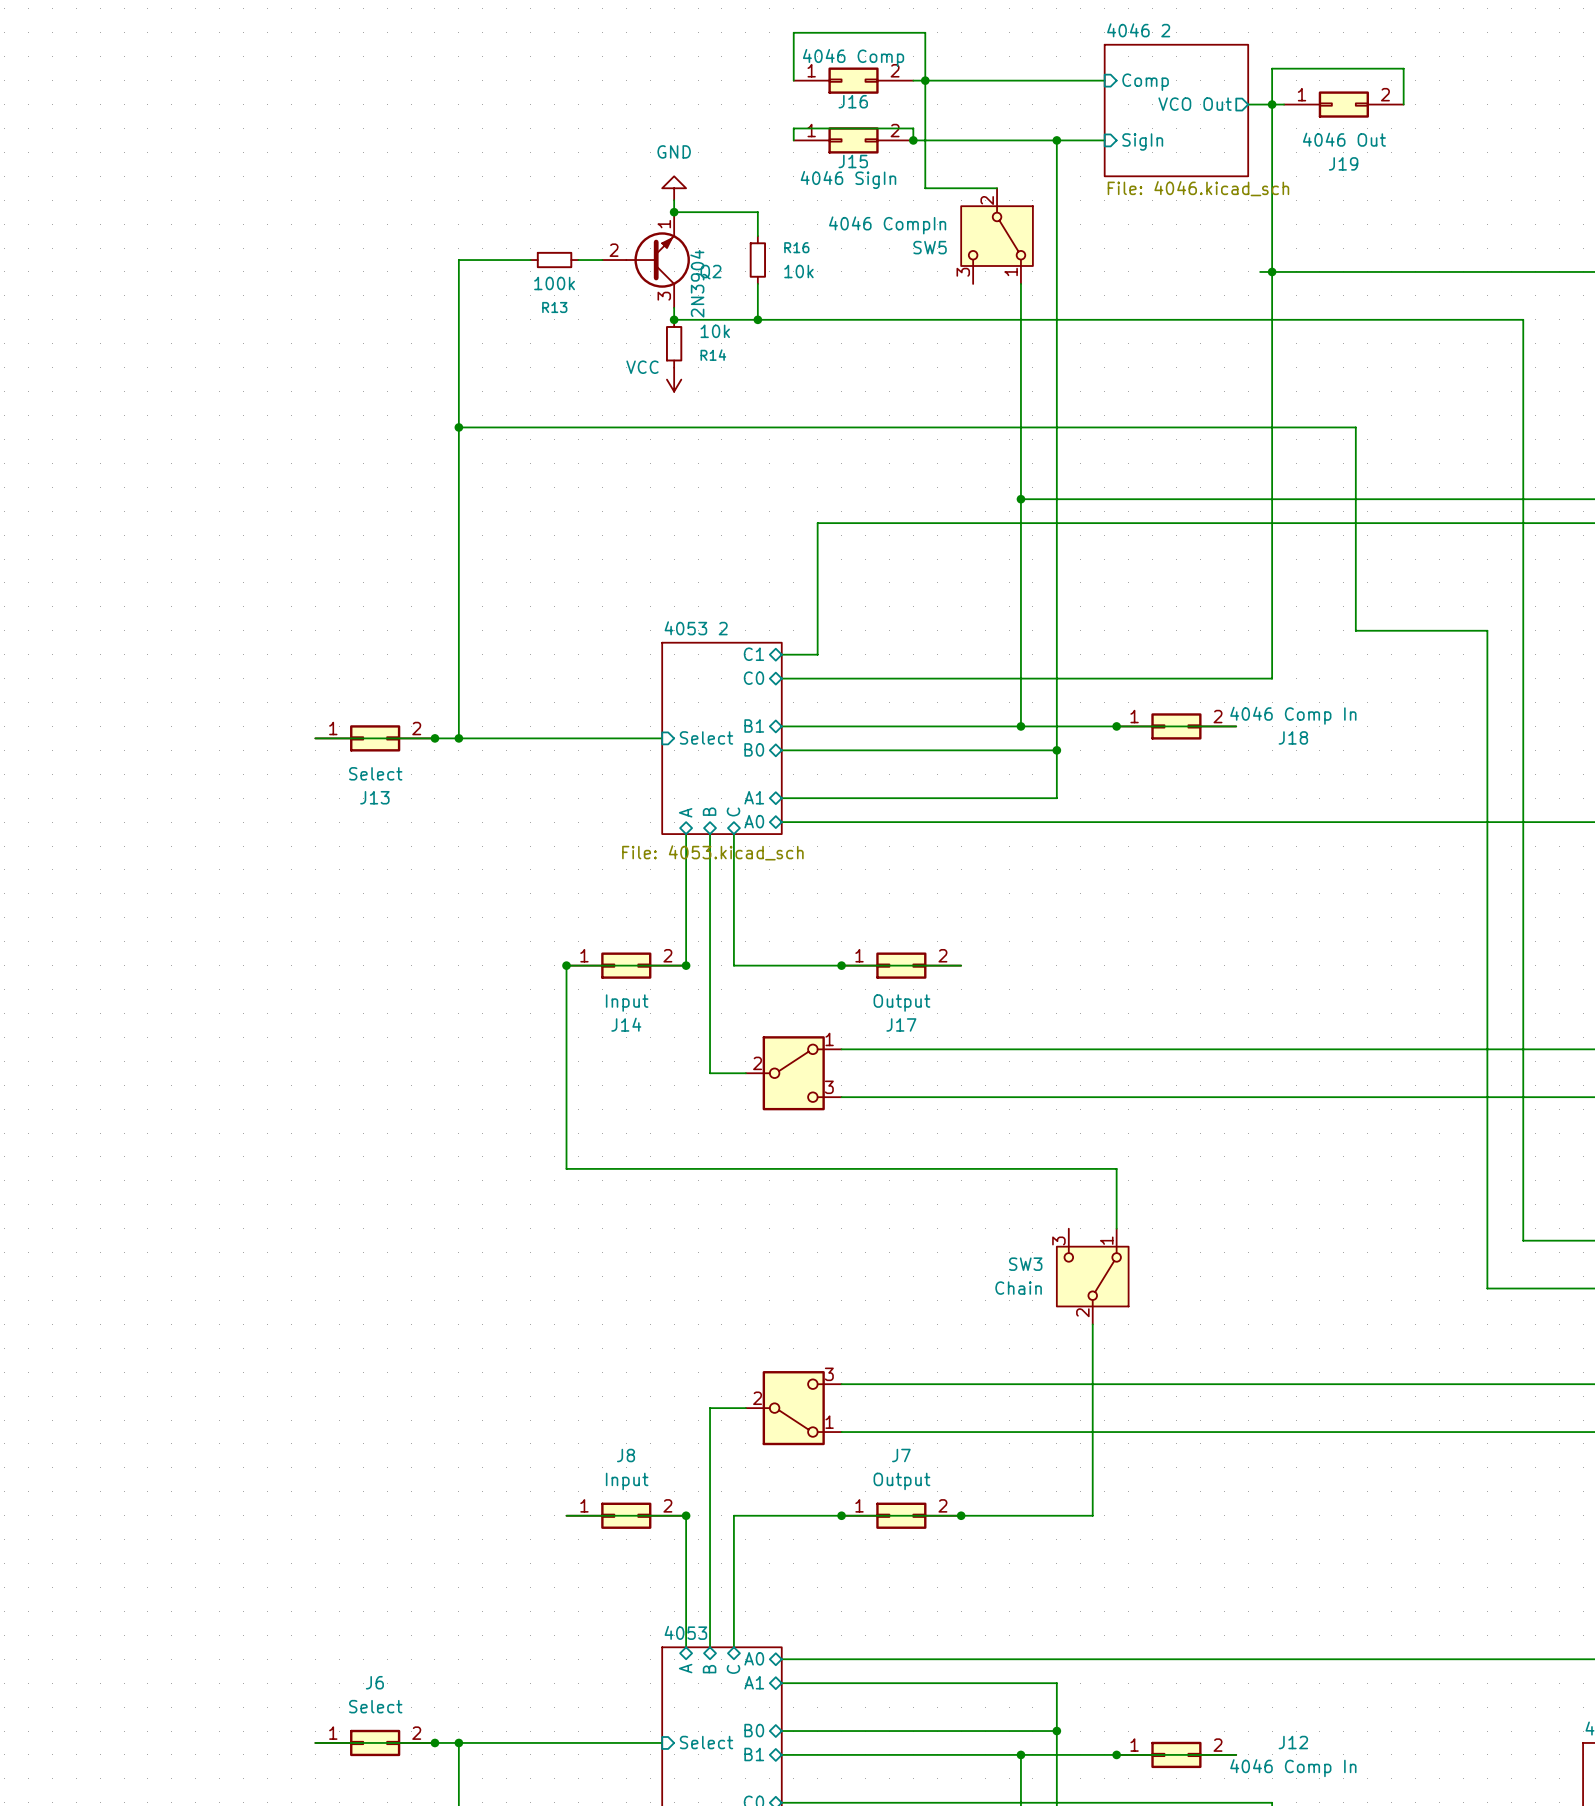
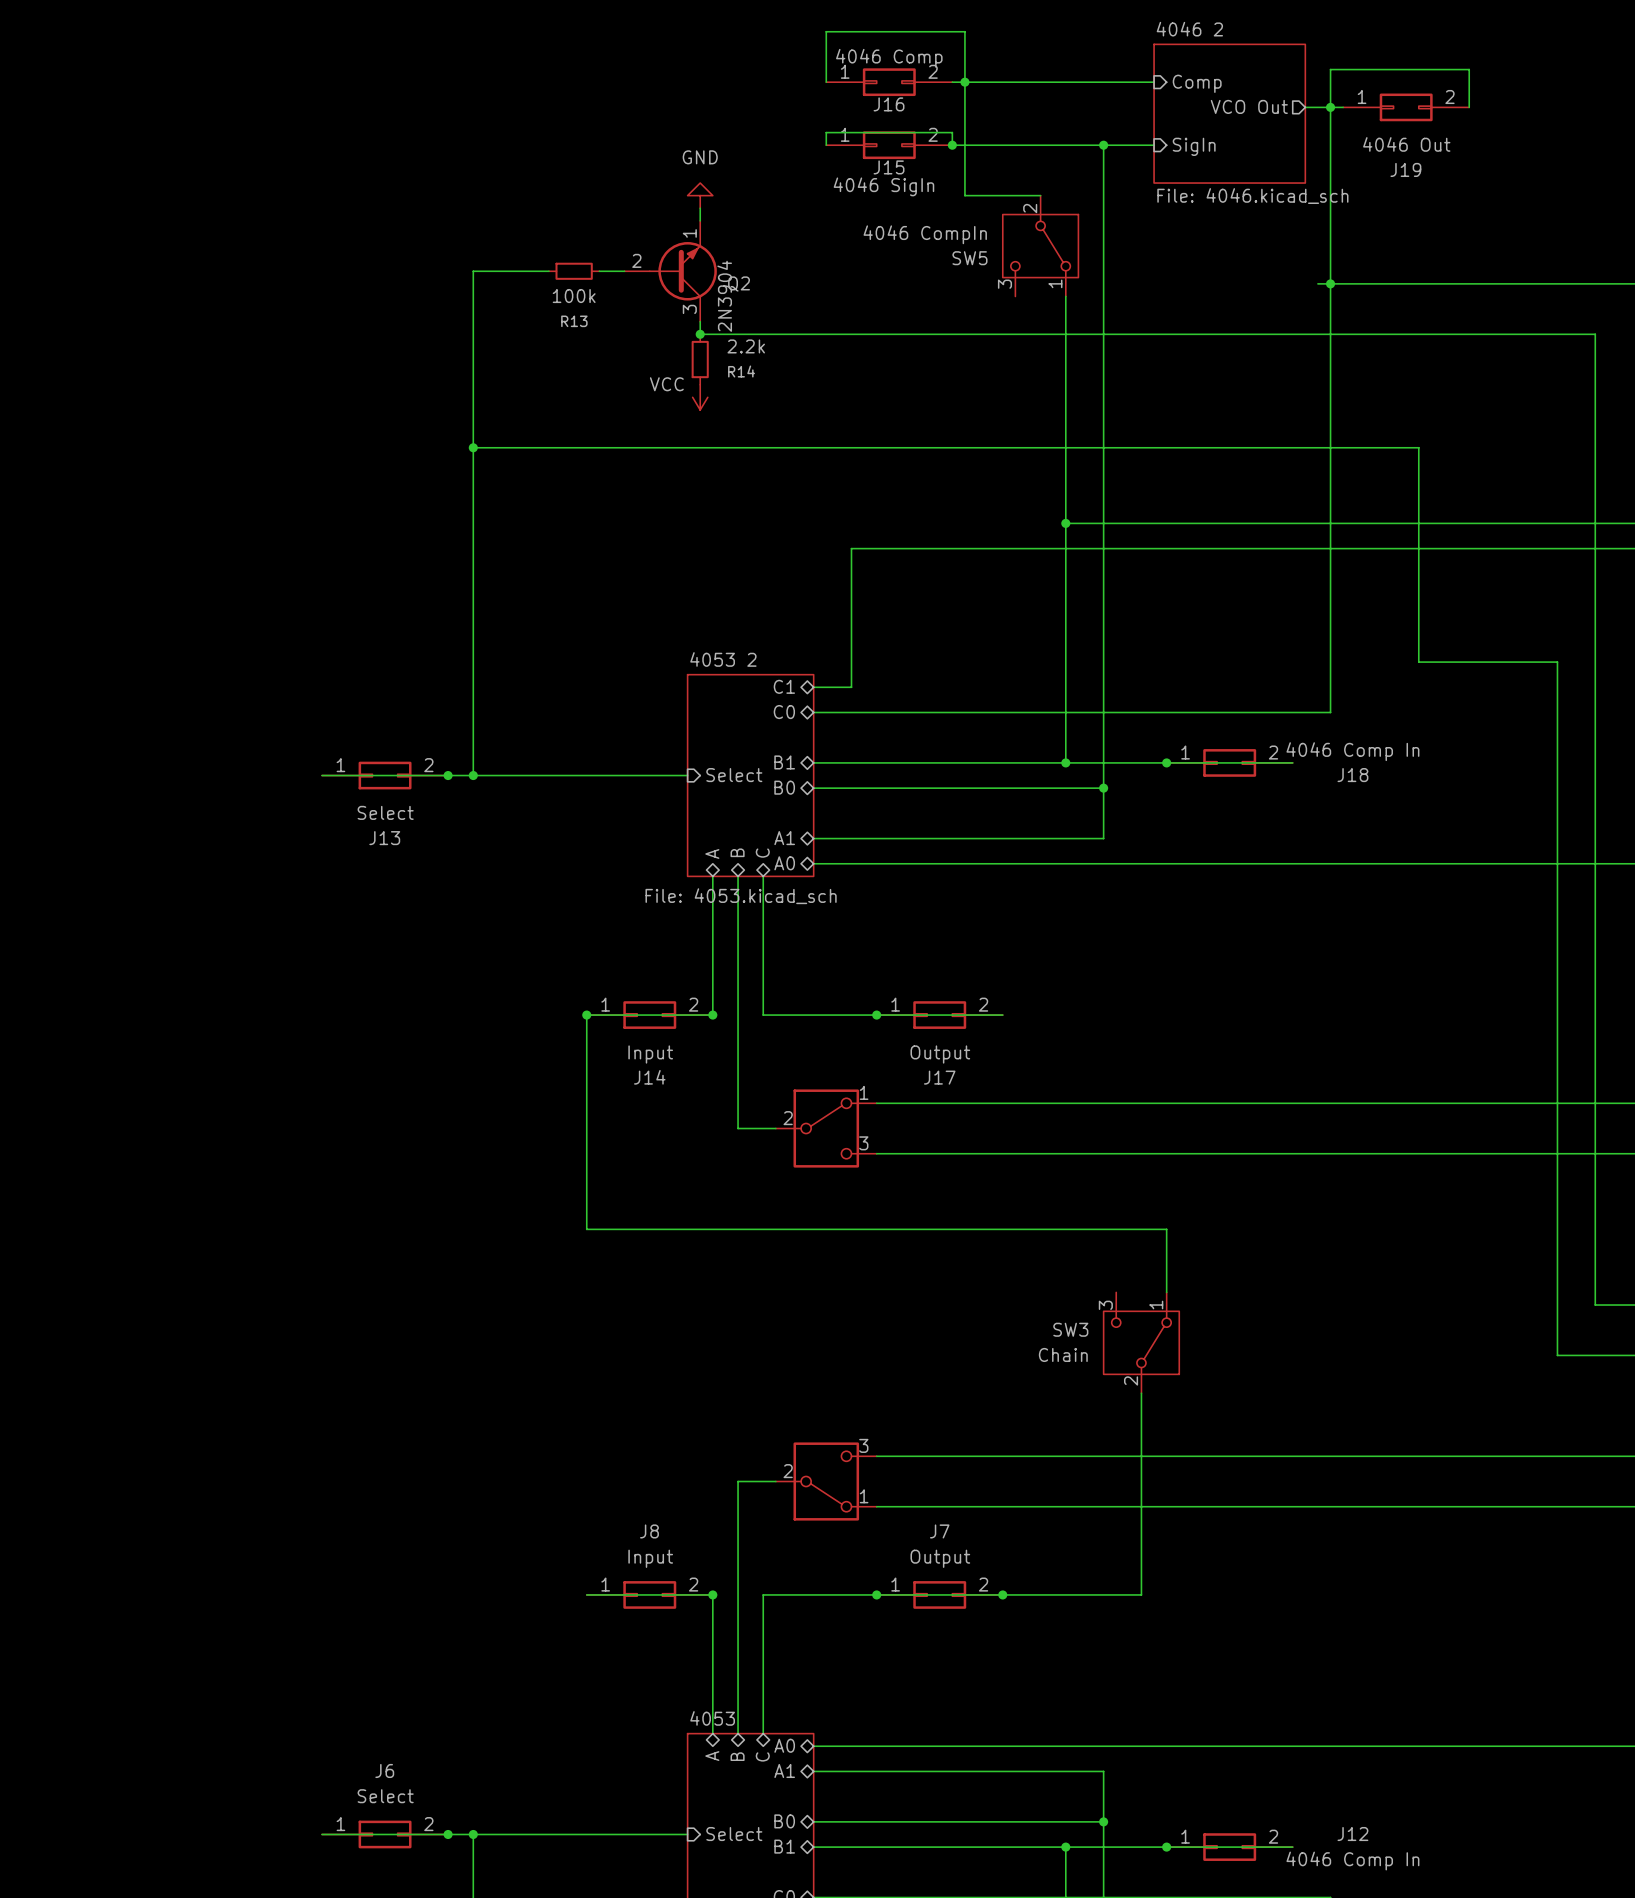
wire: (674, 212) (757, 212) (757, 236) -> none
junction: (674, 212) -> none
R16: 10k (757, 260) -> none
wire: (757, 283) (757, 319) -> none
junction: (757, 319) -> none
R14 value: 10k (715, 331) -> 2.2k (746, 346)

